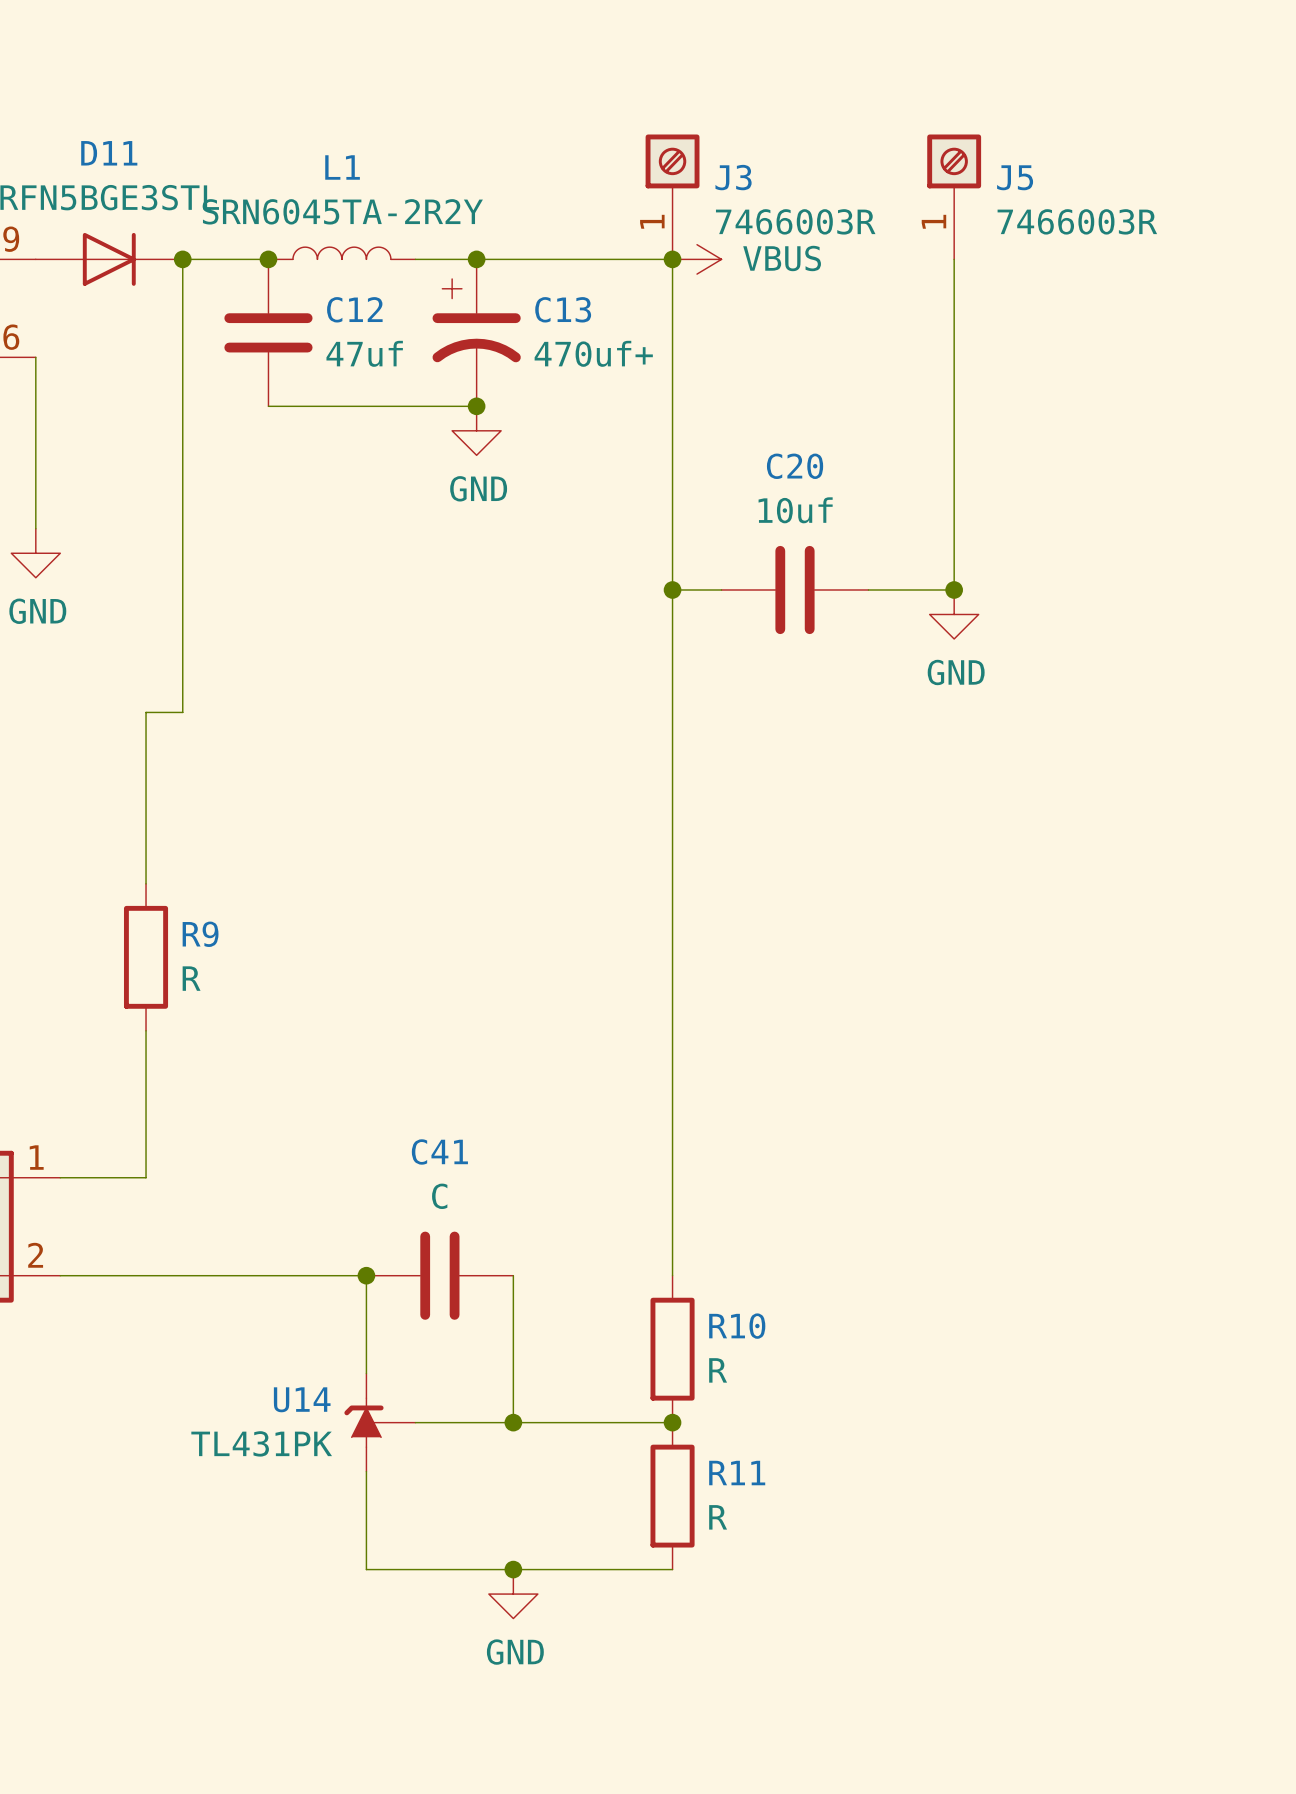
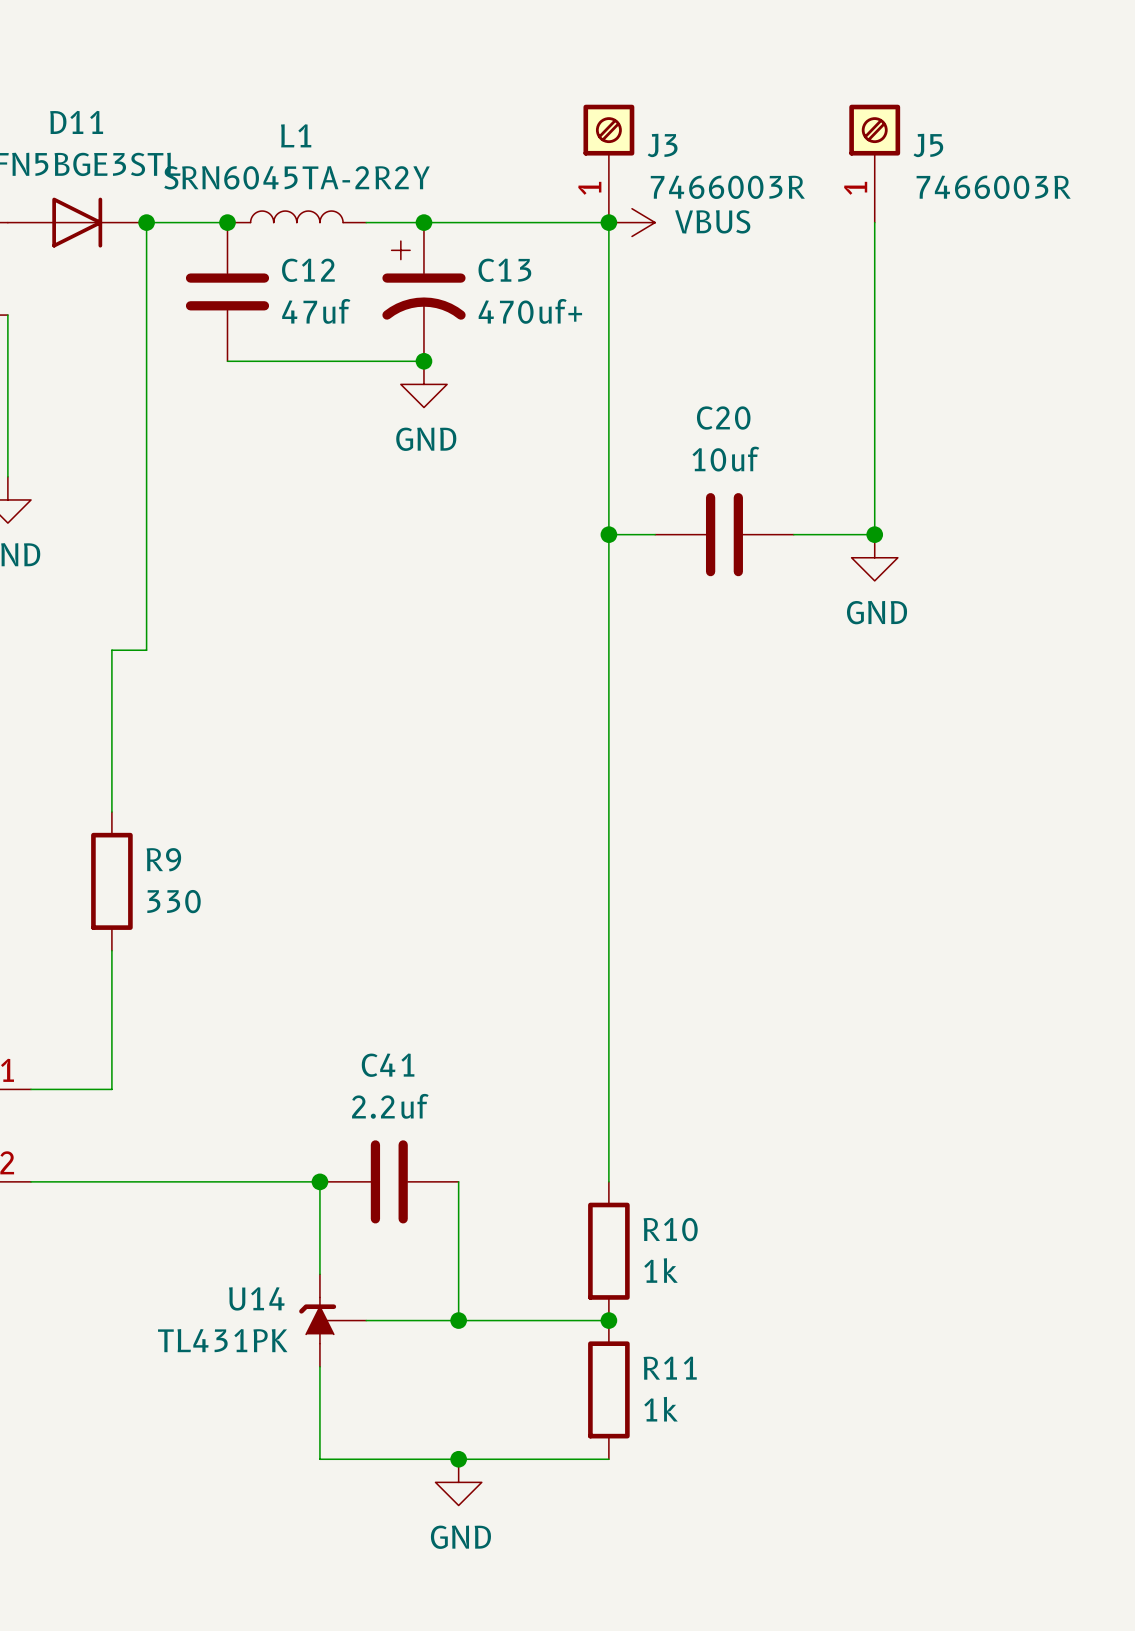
R9 value: R (191, 978) -> 330 (174, 901)
C41 value: C (439, 1196) -> 2.2uf (390, 1106)
R10 value: R (718, 1370) -> 1k (661, 1270)
R11 value: R (718, 1517) -> 1k (661, 1409)

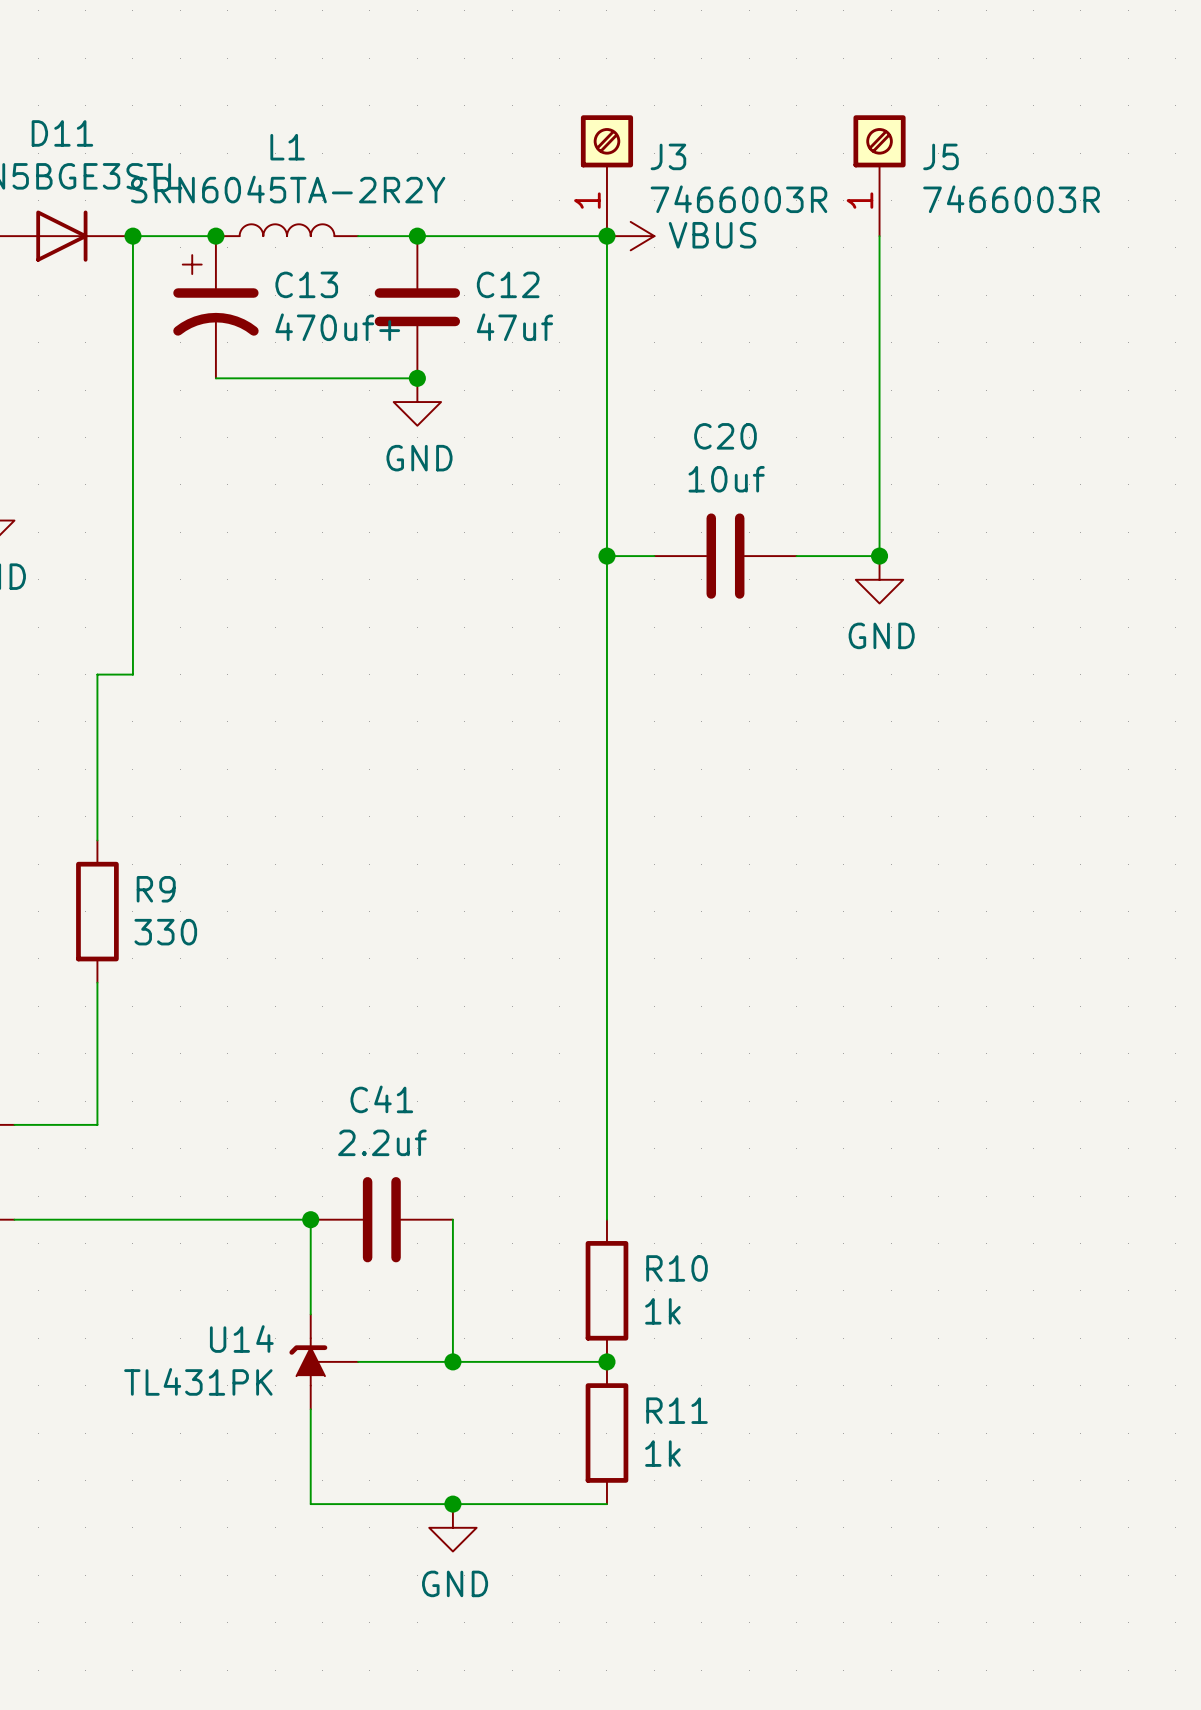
C12 position: (227, 291) -> (417, 307)
C13 position: (424, 291) -> (215, 307)

